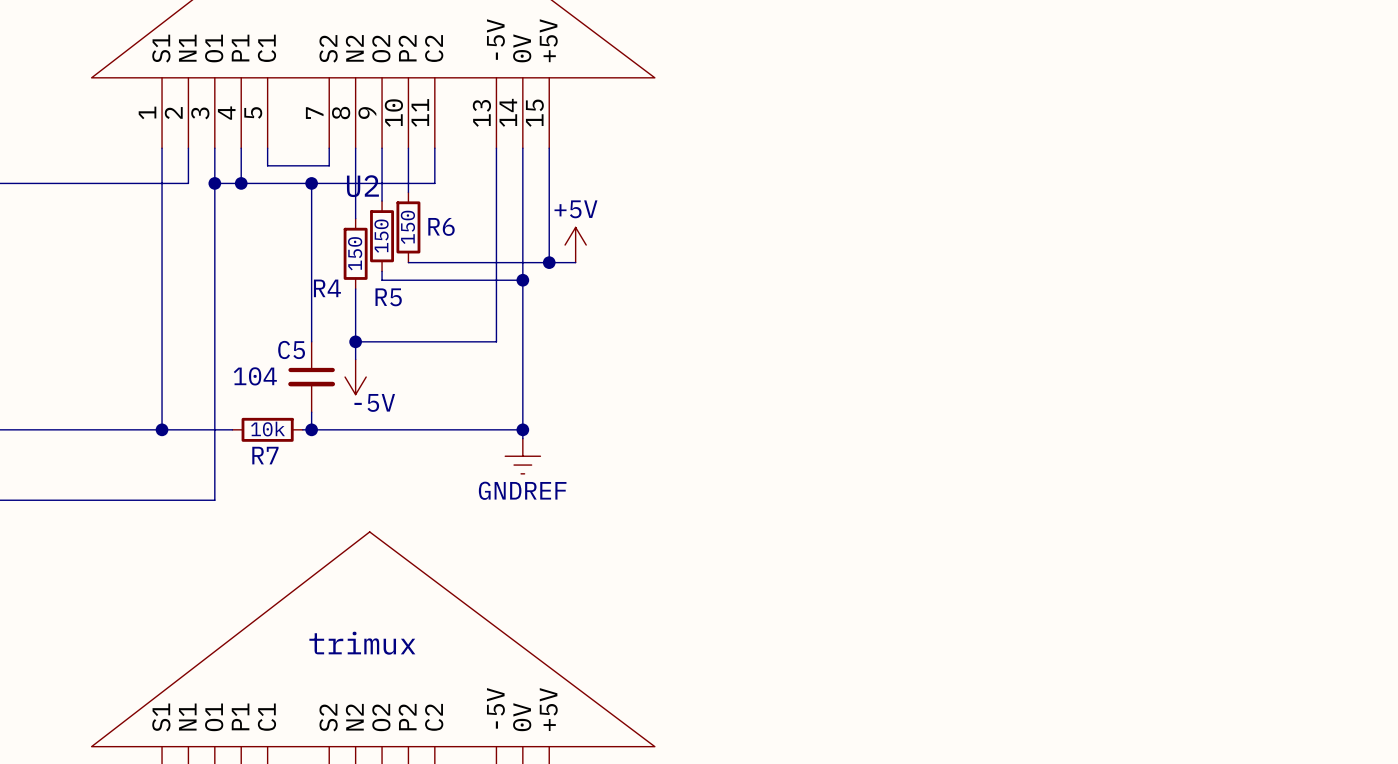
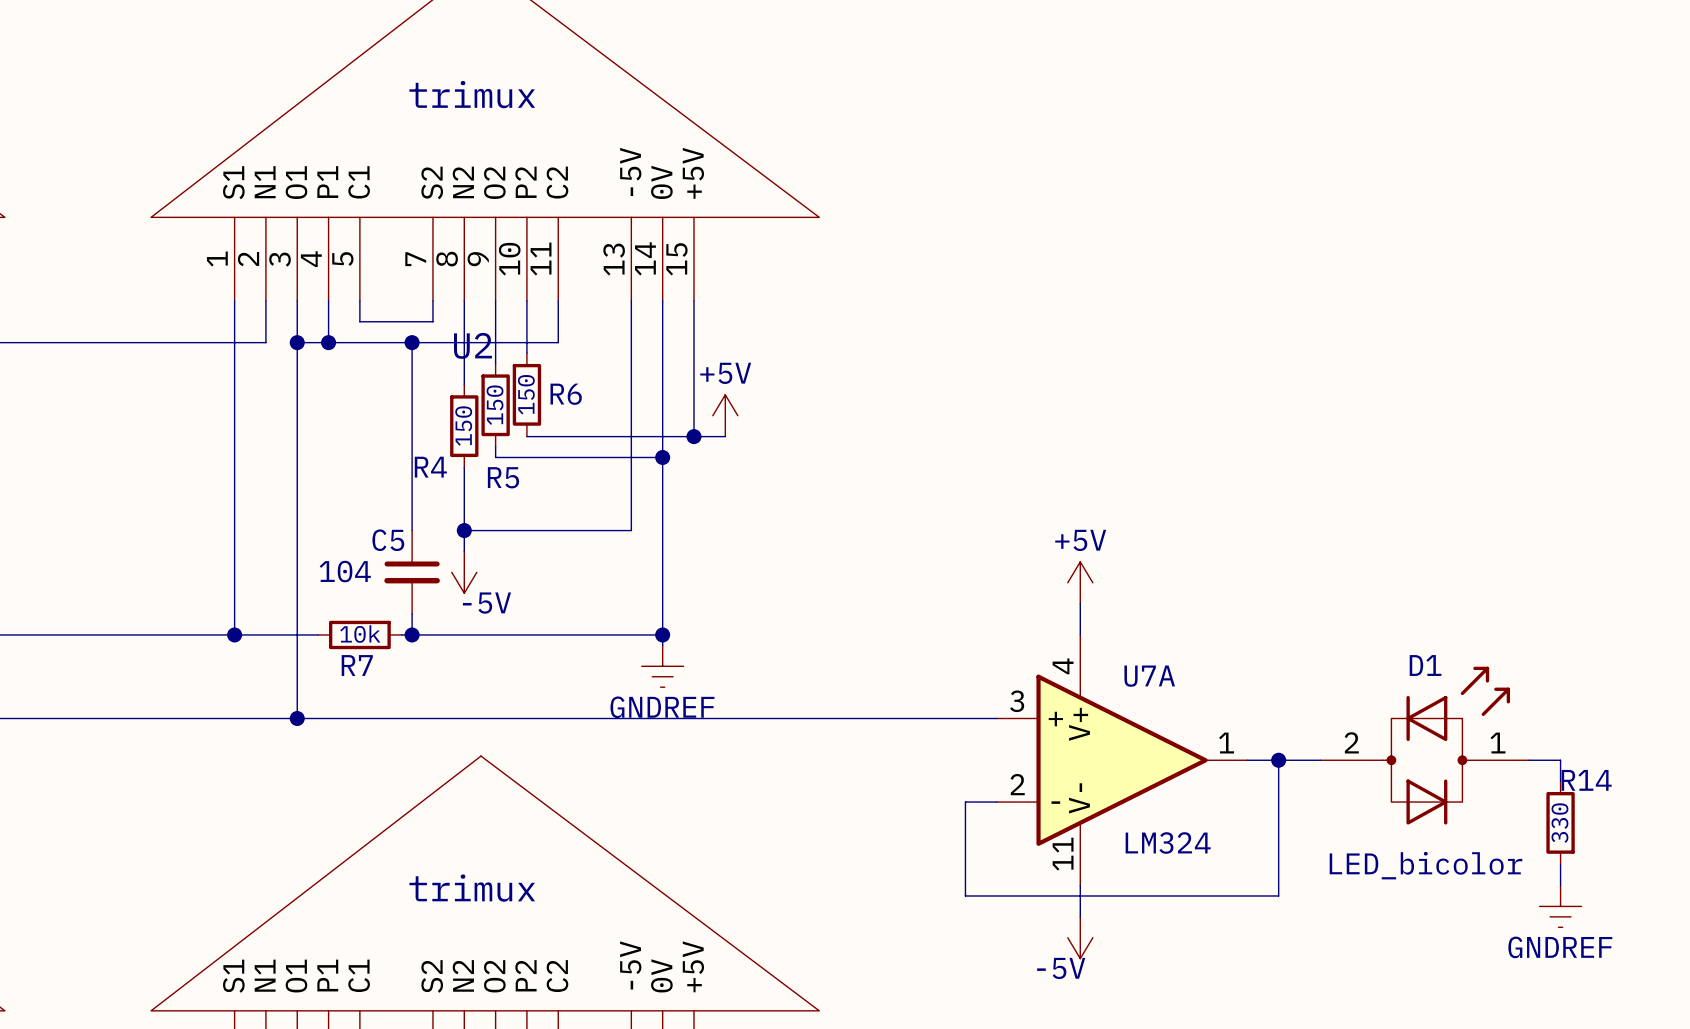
power symbol: none -> +5V (1080, 582)
wire: none -> (1080, 603) (1080, 634)
wire: none -> (297, 718) (996, 718)
junction: none -> (297, 718)
D1: none -> LED_bicolor (1424, 745)
U7A: none -> LM324 (1122, 760)
wire: none -> (1247, 760) (1320, 760)
wire: none -> (1278, 760) (1278, 895) (965, 895) (965, 802) (996, 802)
junction: none -> (1278, 760)
wire: none -> (1529, 760) (1560, 760) (1560, 781)
R14: none -> 330 (1560, 822)
wire: none -> (1560, 864) (1560, 885)
wire: none -> (1080, 885) (1080, 916)
power symbol: none -> GNDREF (1560, 906)
power symbol: none -> -5V (1080, 937)

